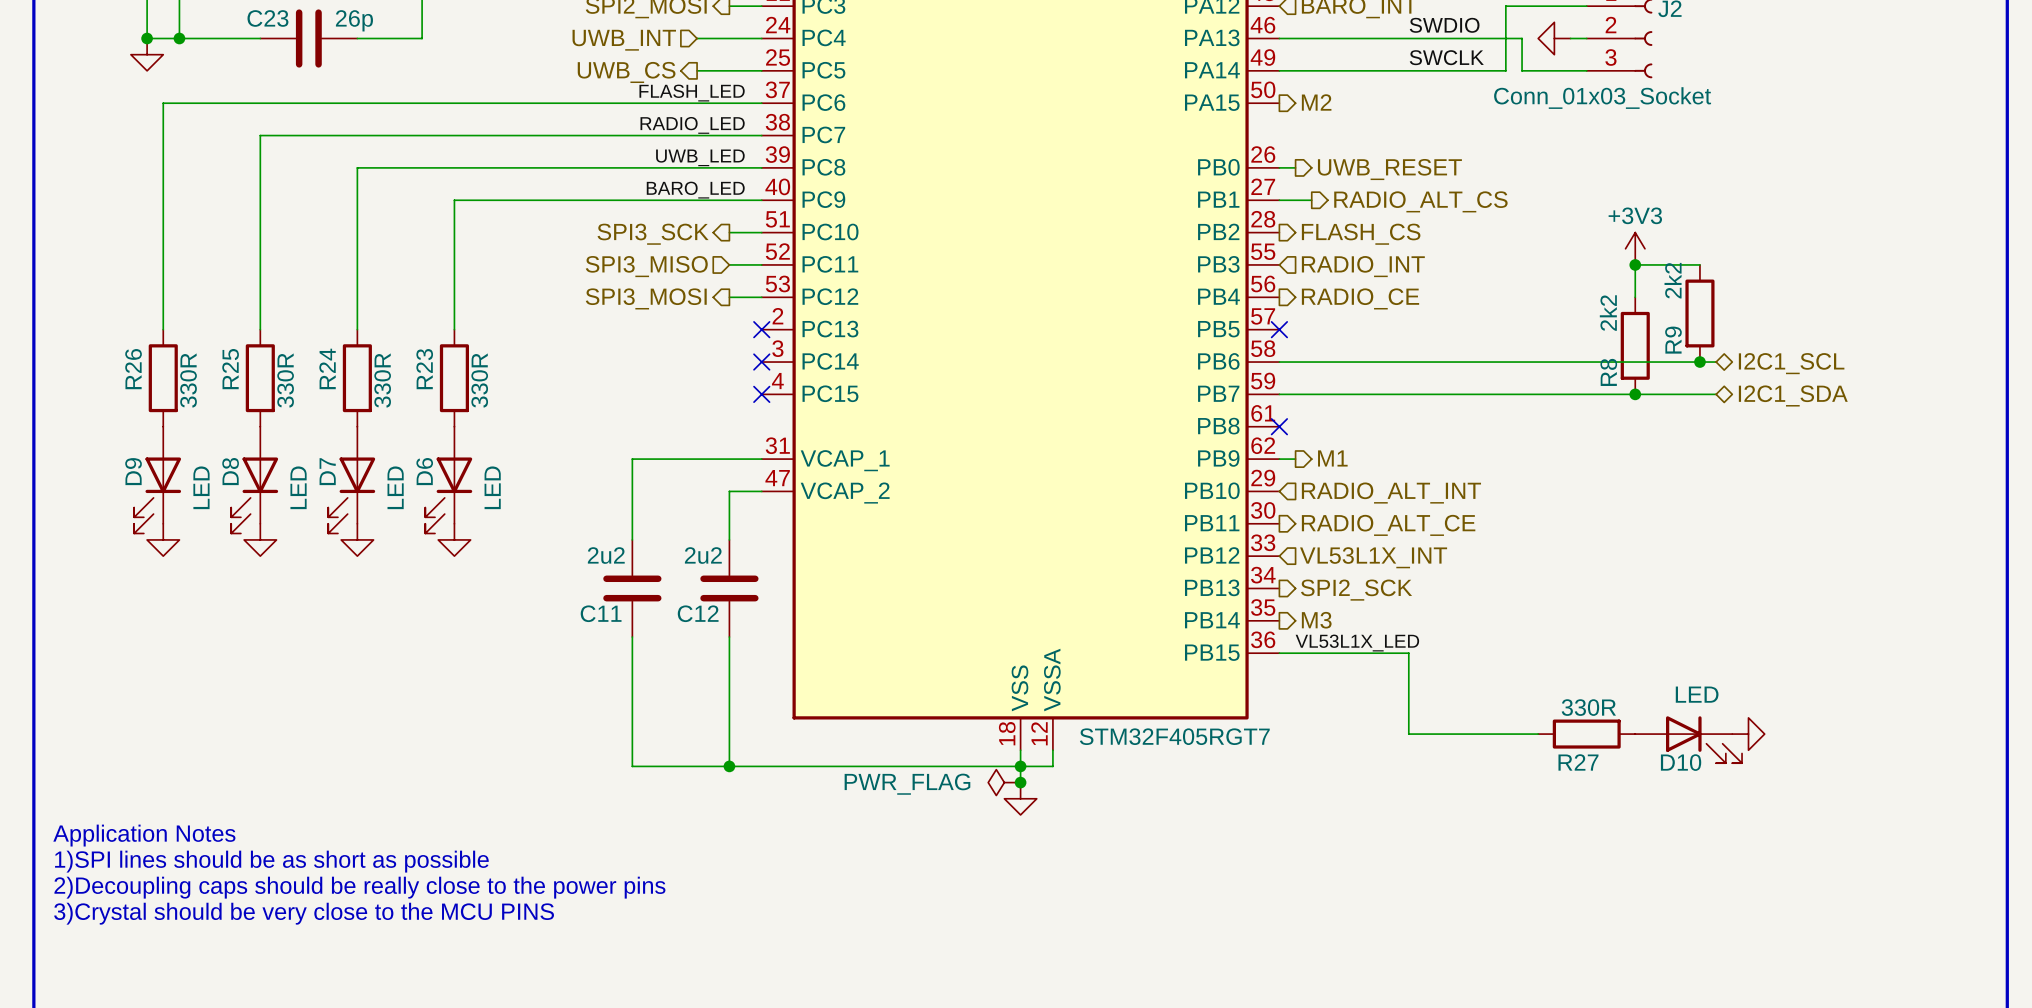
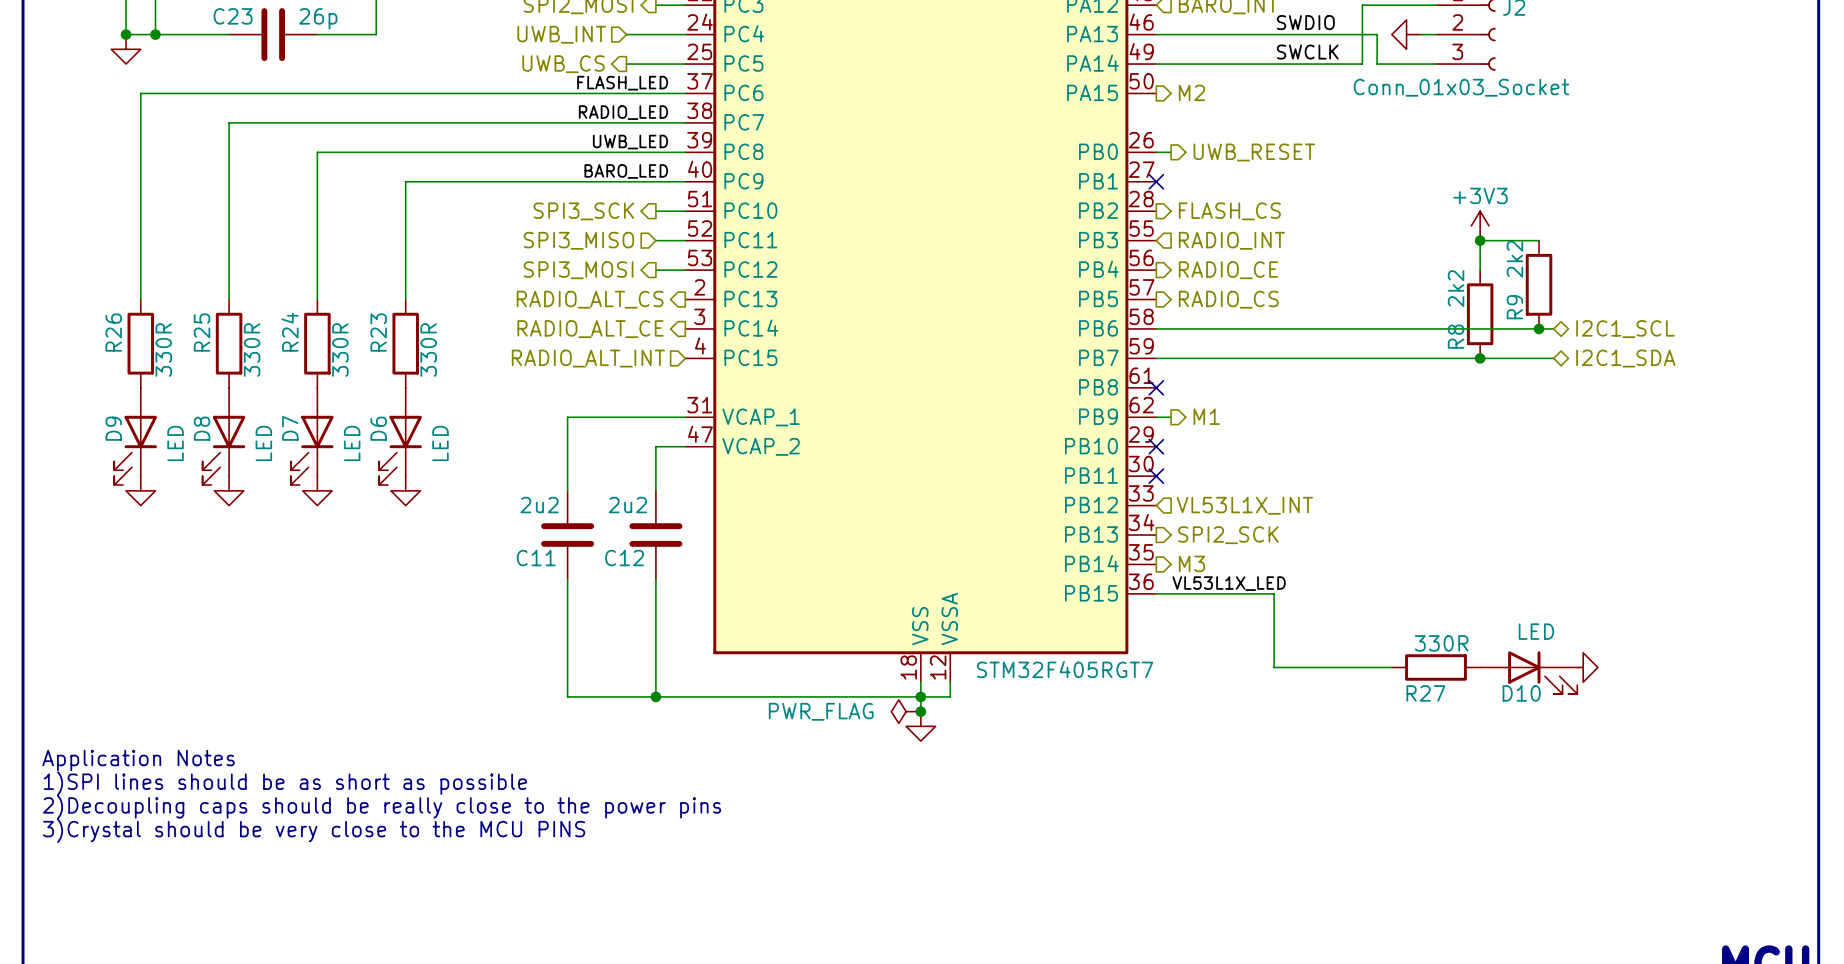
wire: (1279, 200) (1311, 200) -> none
no-connect mark: none -> (1156, 181)
hierarchical label: RADIO_ALT_CS (1420, 201) -> none
no-connect mark: (761, 329) -> none
no-connect mark: (1279, 329) -> none
hierarchical label: none -> RADIO_ALT_CS (590, 299)
hierarchical label: none -> RADIO_CS (1228, 299)
no-connect mark: (761, 362) -> none
hierarchical label: none -> RADIO_ALT_CE (590, 329)
no-connect mark: (761, 394) -> none
hierarchical label: none -> RADIO_ALT_INT (588, 358)
no-connect mark: none -> (1156, 446)
hierarchical label: RADIO_ALT_INT (1391, 493) -> none
no-connect mark: none -> (1156, 476)
hierarchical label: RADIO_ALT_CE (1388, 525) -> none

